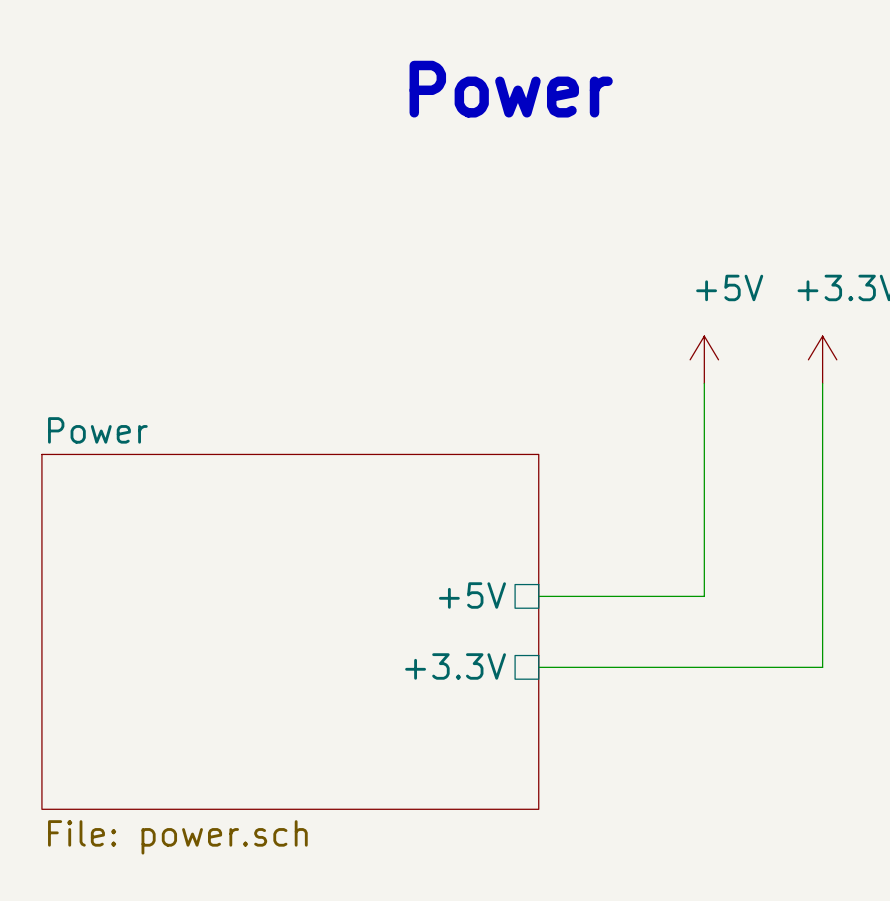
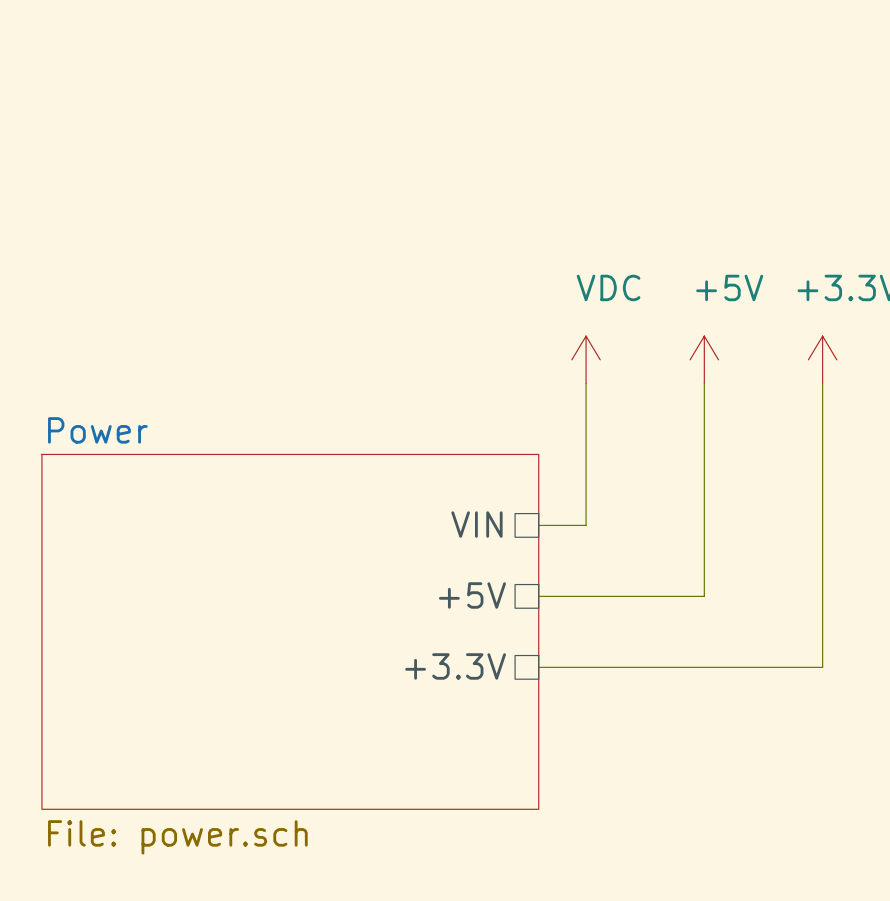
text: Power (511, 89) -> none
power symbol: none -> VDC (586, 359)
wire: none -> (586, 383) (586, 525) (538, 525)
sheet pin: none -> VIN (476, 524)

